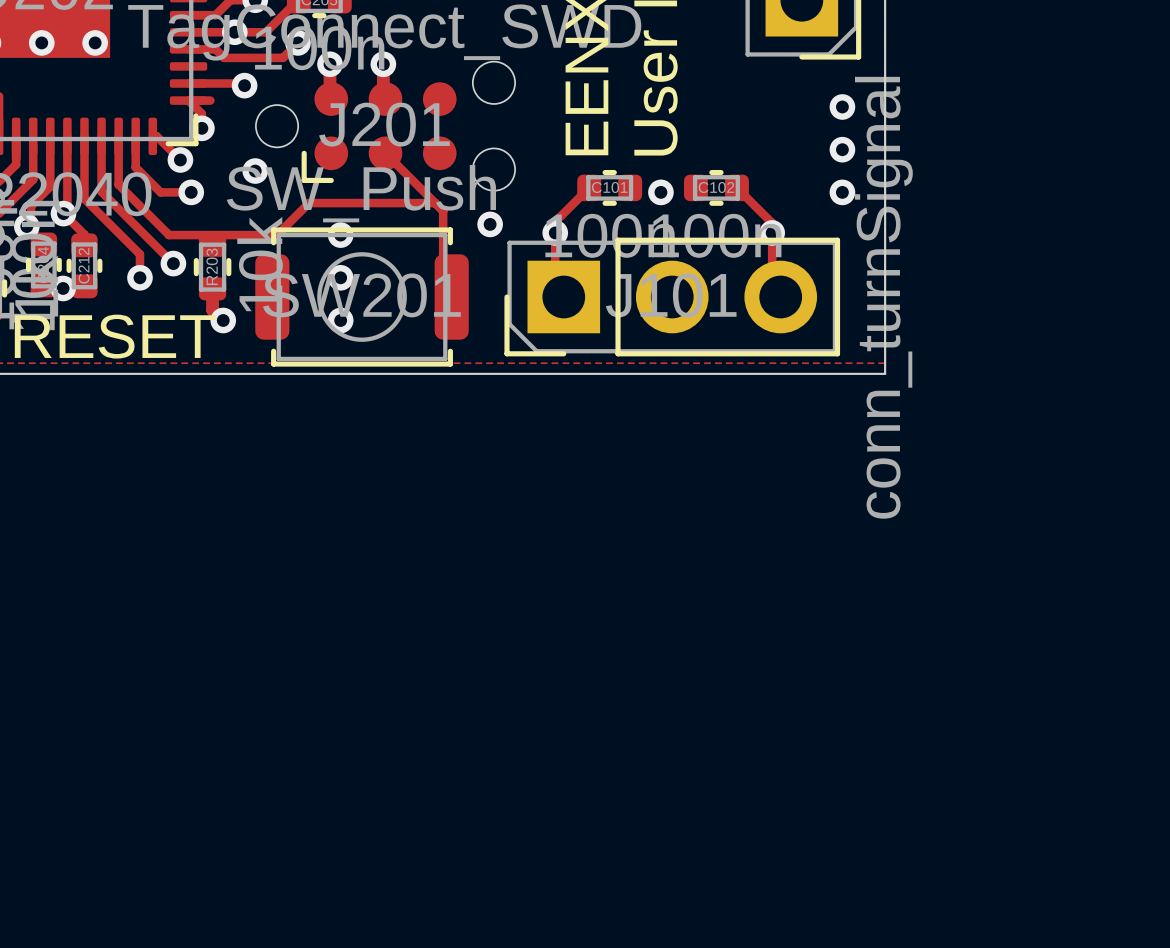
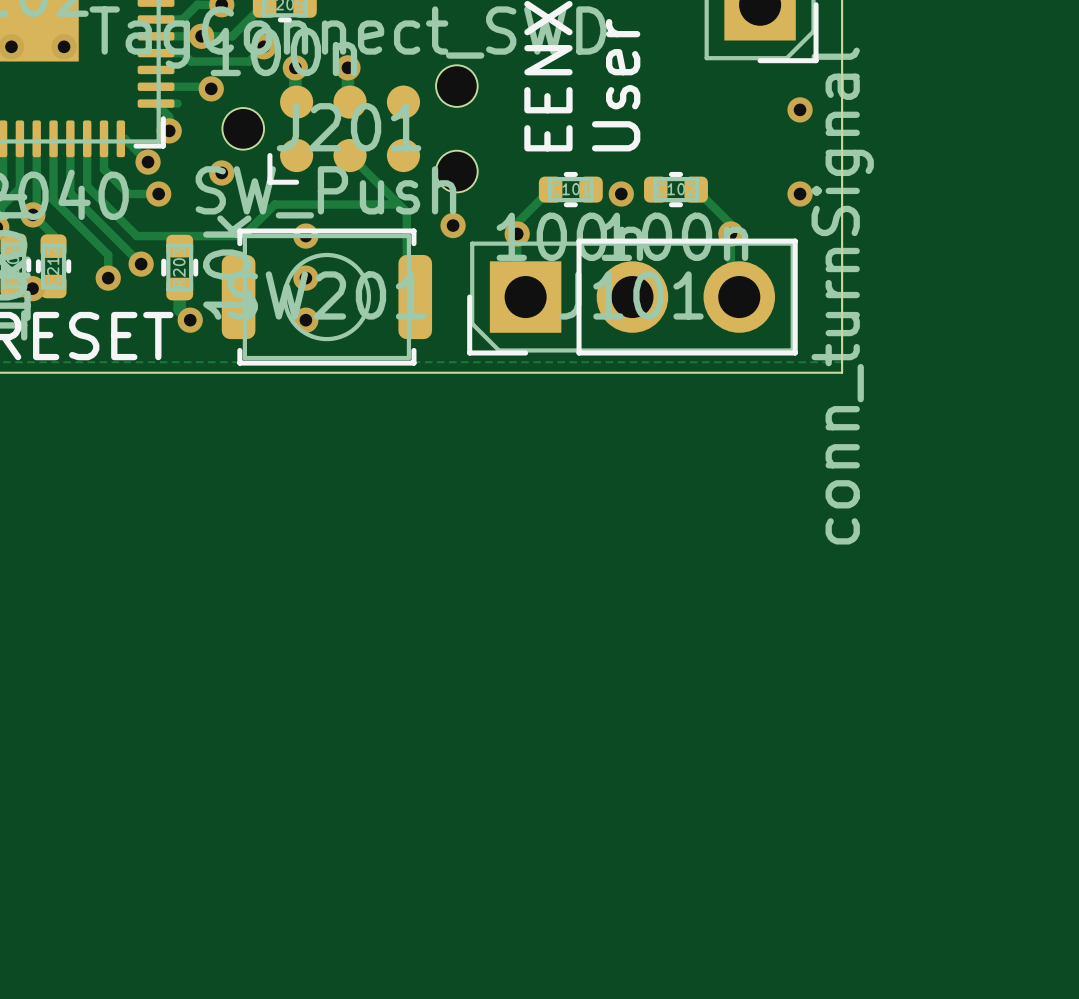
via: (842, 149) -> none

